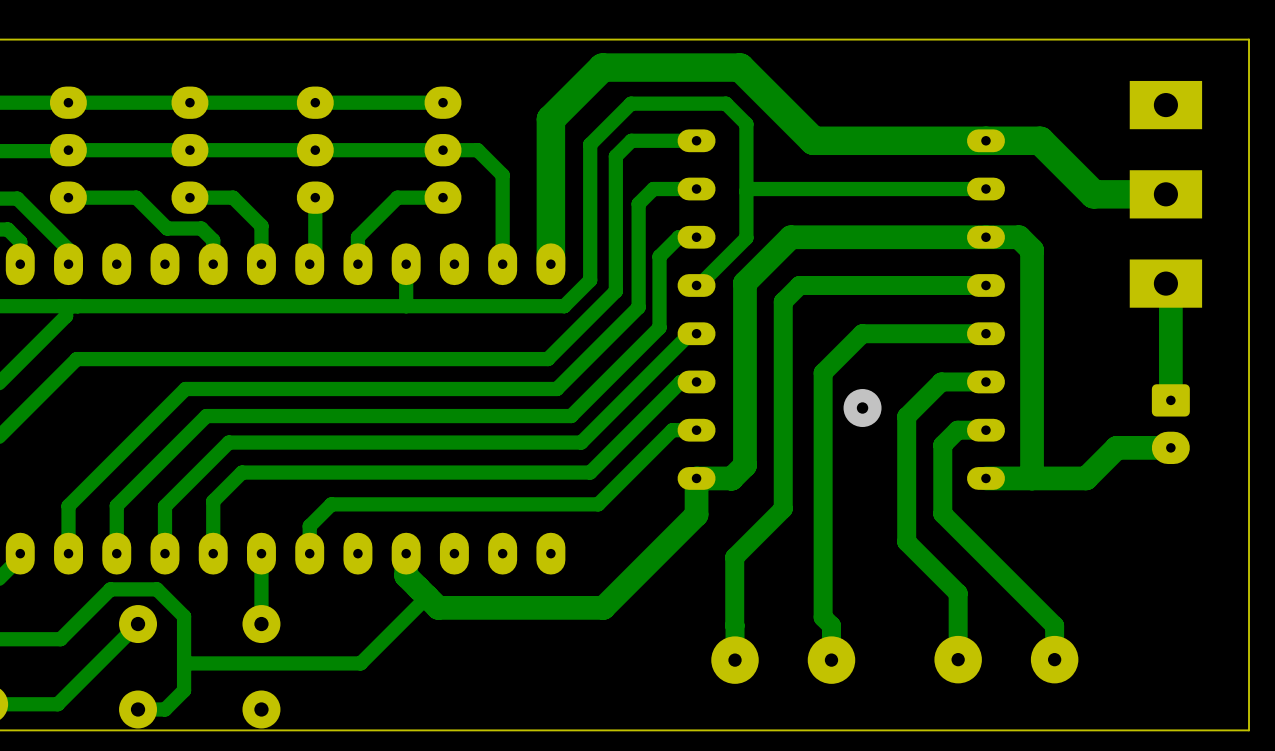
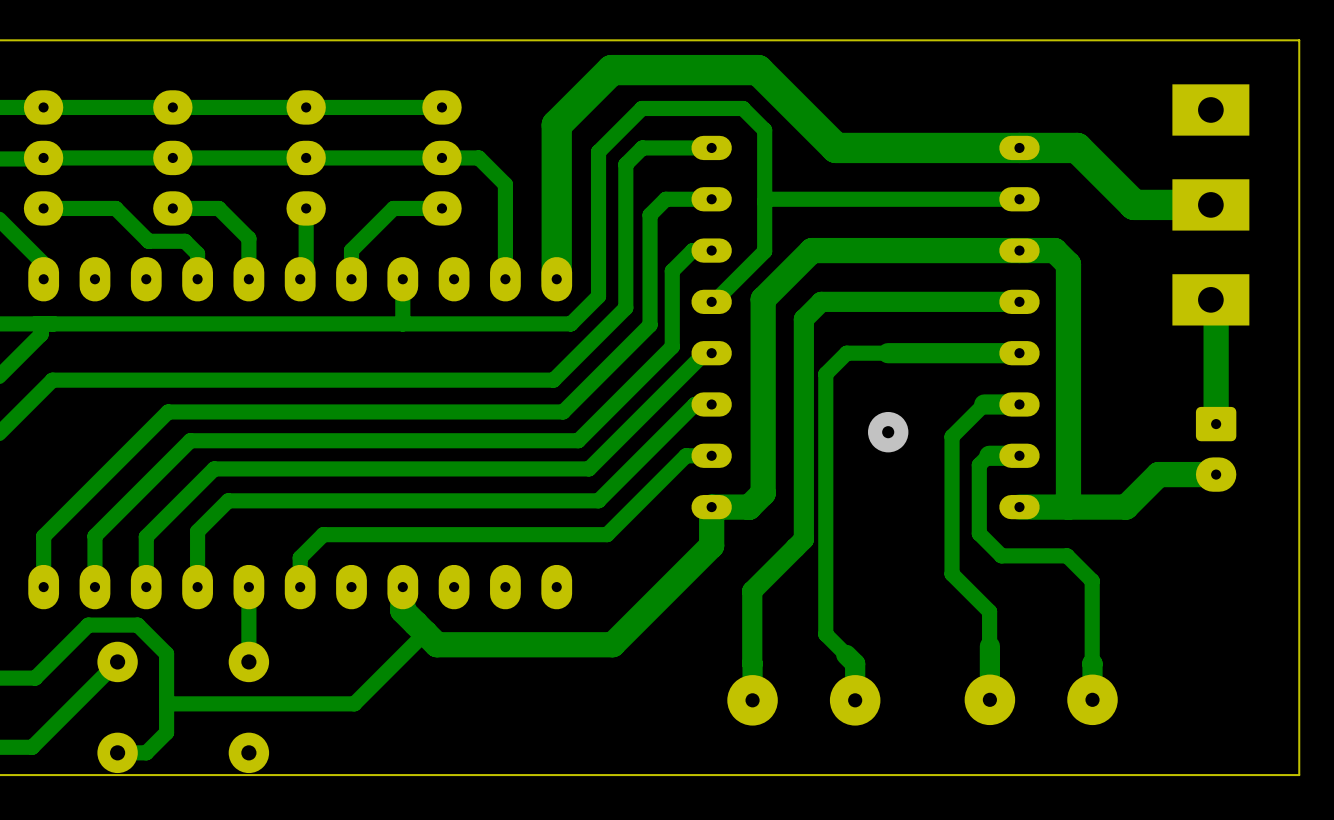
track: (862, 333) (823, 372) (823, 617) -> (887, 353) (846, 353) (825, 374) (825, 634) (846, 654)
track: (952, 381) (941, 381) (906, 416) (906, 541) (958, 593) (958, 609) -> (984, 404) (952, 436) (952, 574) (989, 611) (989, 663)
track: (957, 430) (942, 445) (942, 513) (1054, 625) -> (989, 455) (979, 464) (979, 533) (1001, 555) (1067, 555) (1092, 580) (1092, 663)

